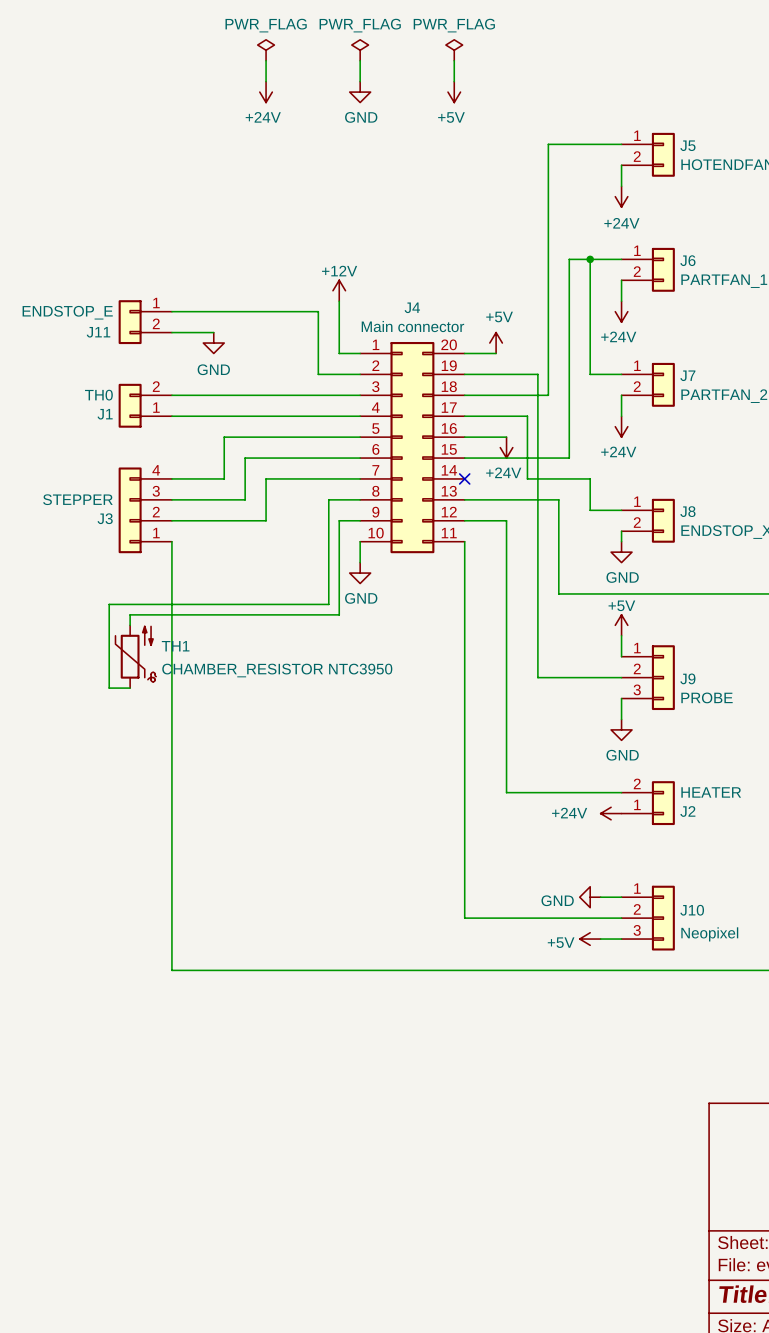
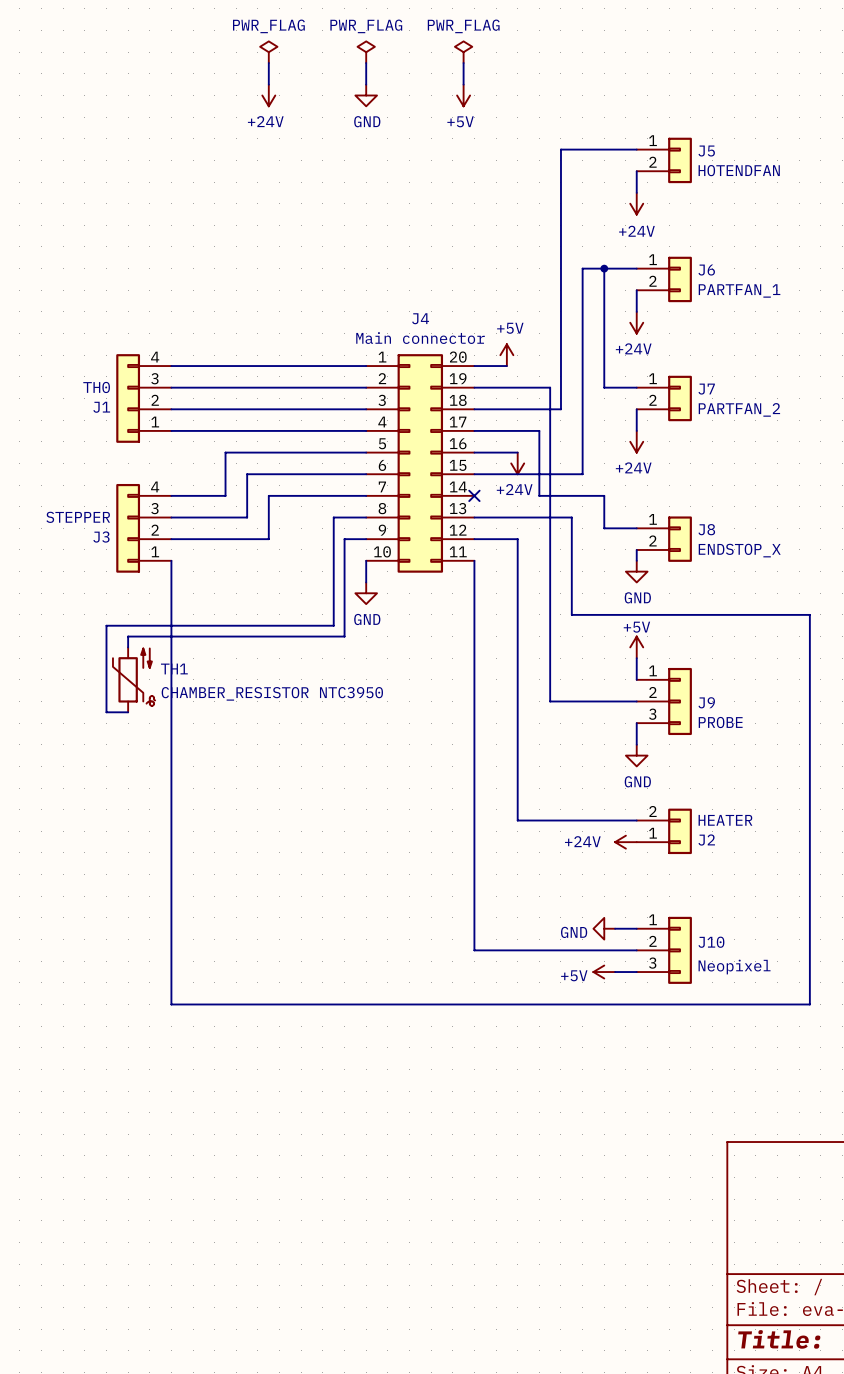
power symbol: +12V (339, 290) -> none
wire: (339, 301) (339, 353) -> (171, 366) (344, 366)
wire: (171, 311) (318, 311) (318, 374) -> (171, 387) (322, 387)
J11: ENDSTOP_E (145, 322) -> none
wire: (171, 332) (213, 332) -> none
power symbol: GND (213, 343) -> none
J1 symbol: [118, 383, 172, 428] -> [116, 354, 172, 443]

